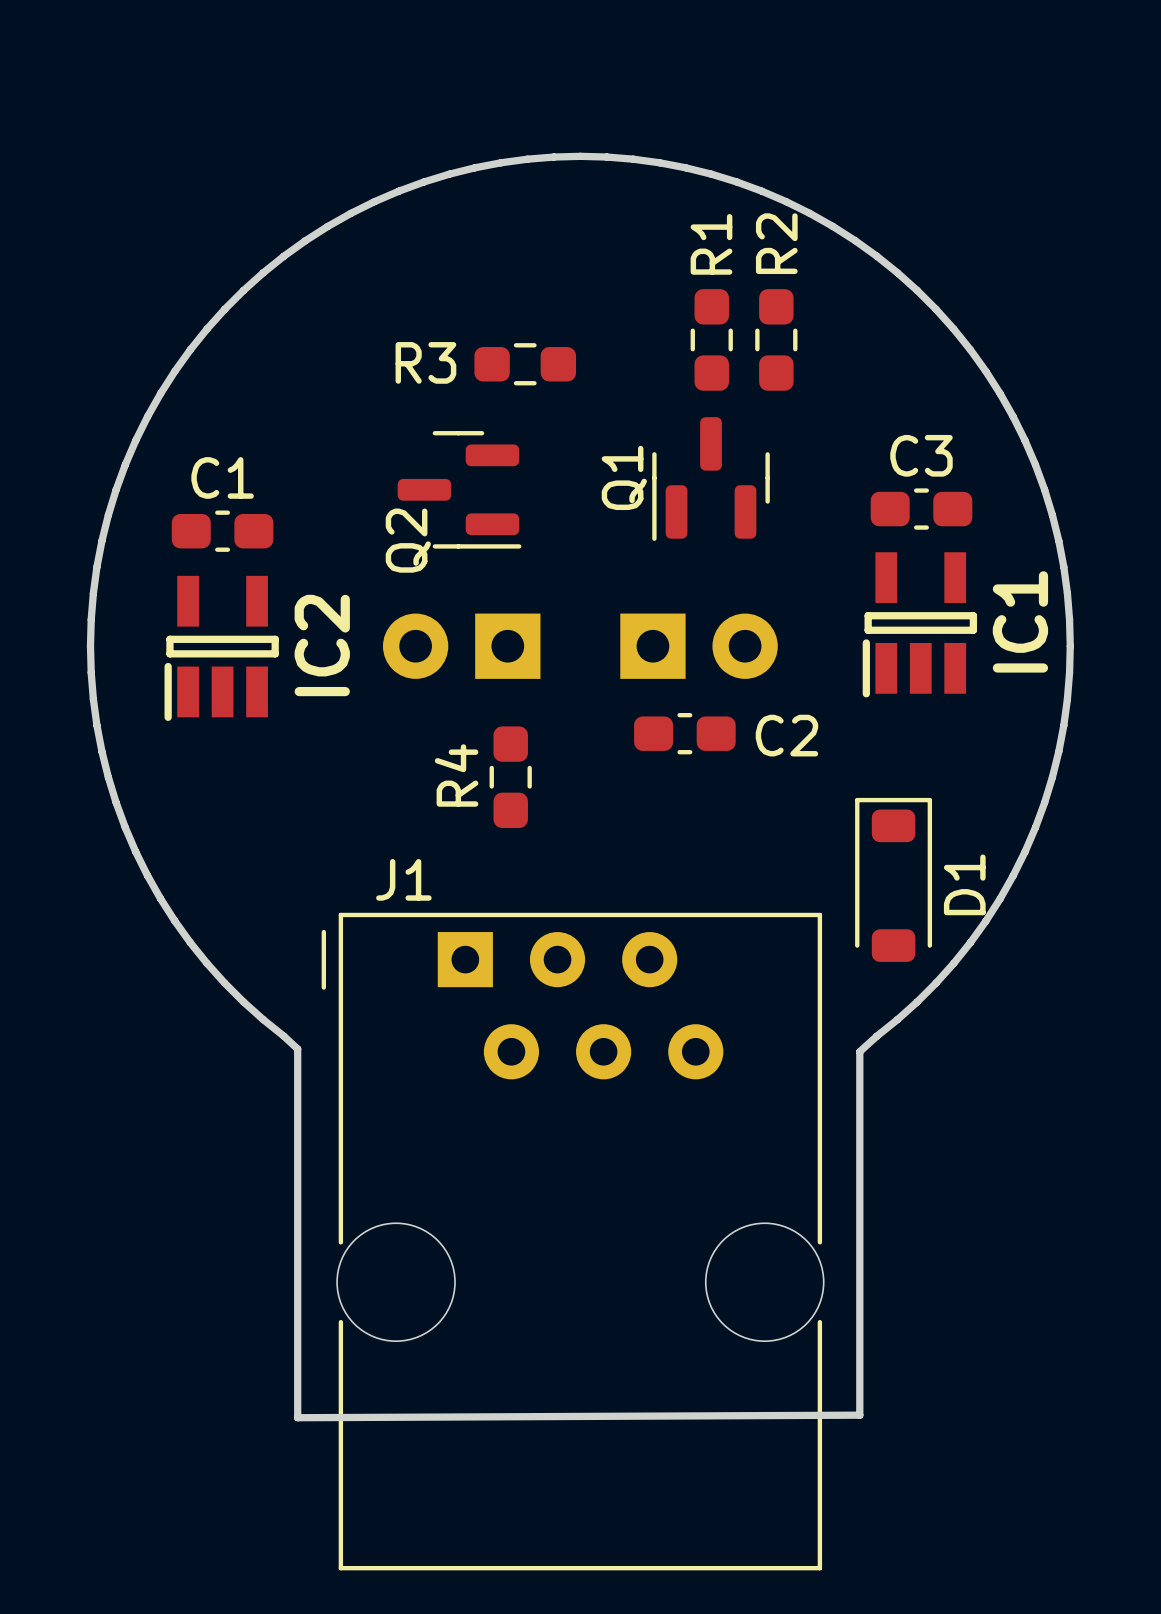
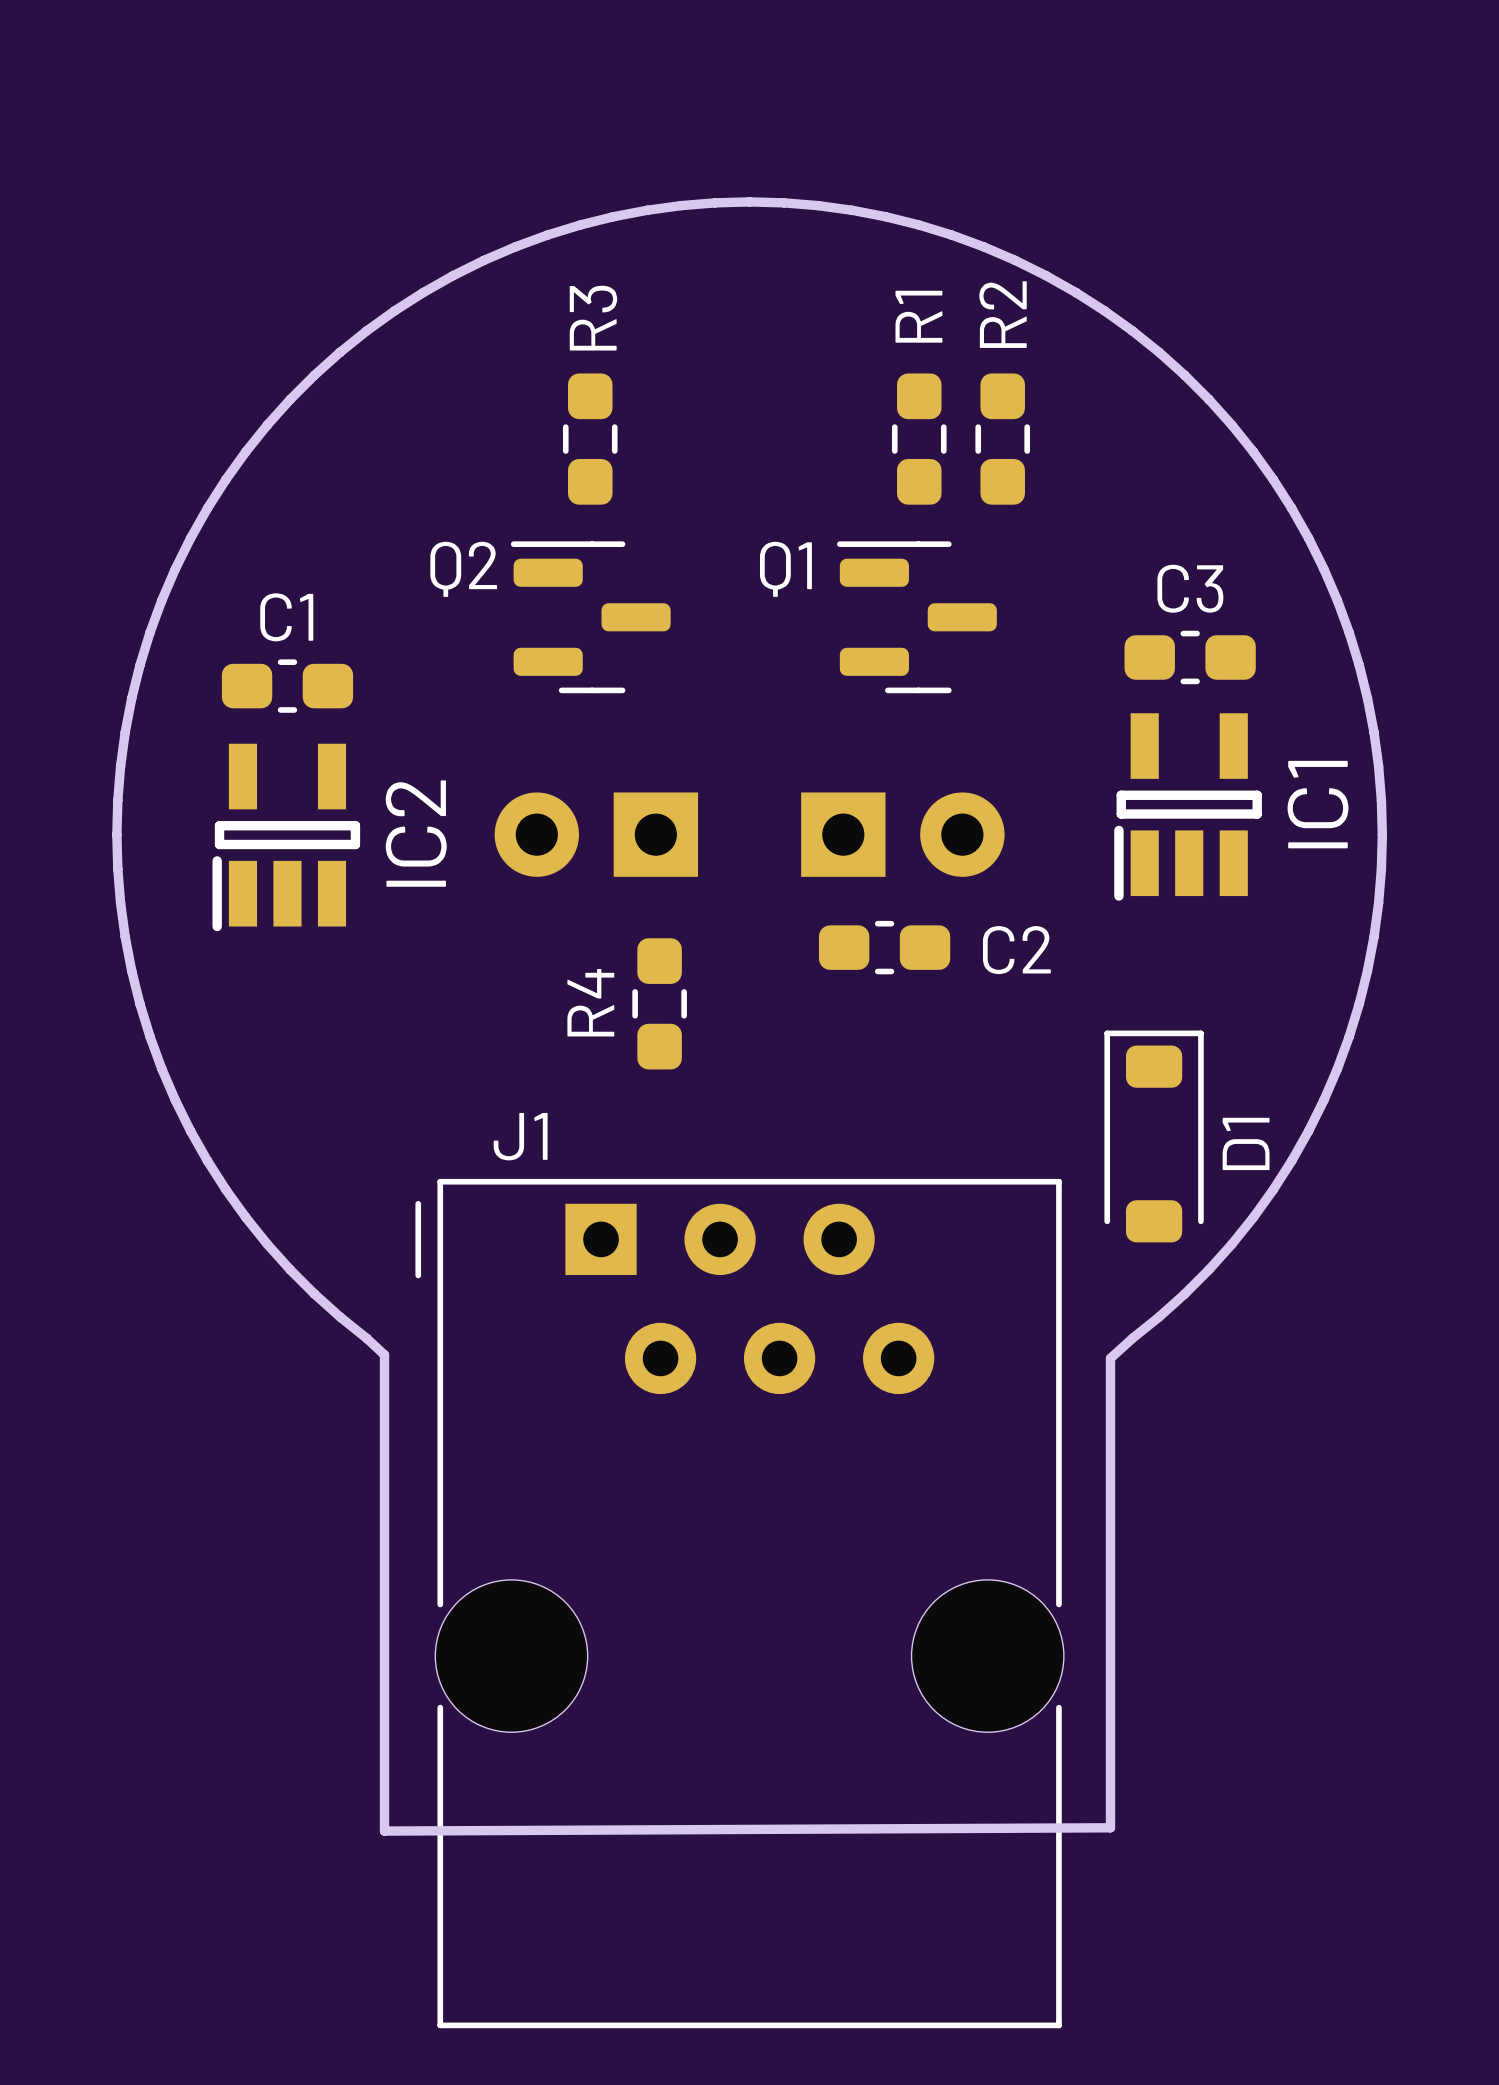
R3 rotation: 0° (525, 364) -> 90° clockwise (590, 439)
R3 position: (525, 364) -> (590, 439)
Q1 rotation: 0° (711, 479) -> 90° clockwise (916, 617)
Q2 rotation: 0° (459, 489) -> 180° (590, 617)
Q2 name position: Q2 (408, 540) -> Q2 (463, 569)

